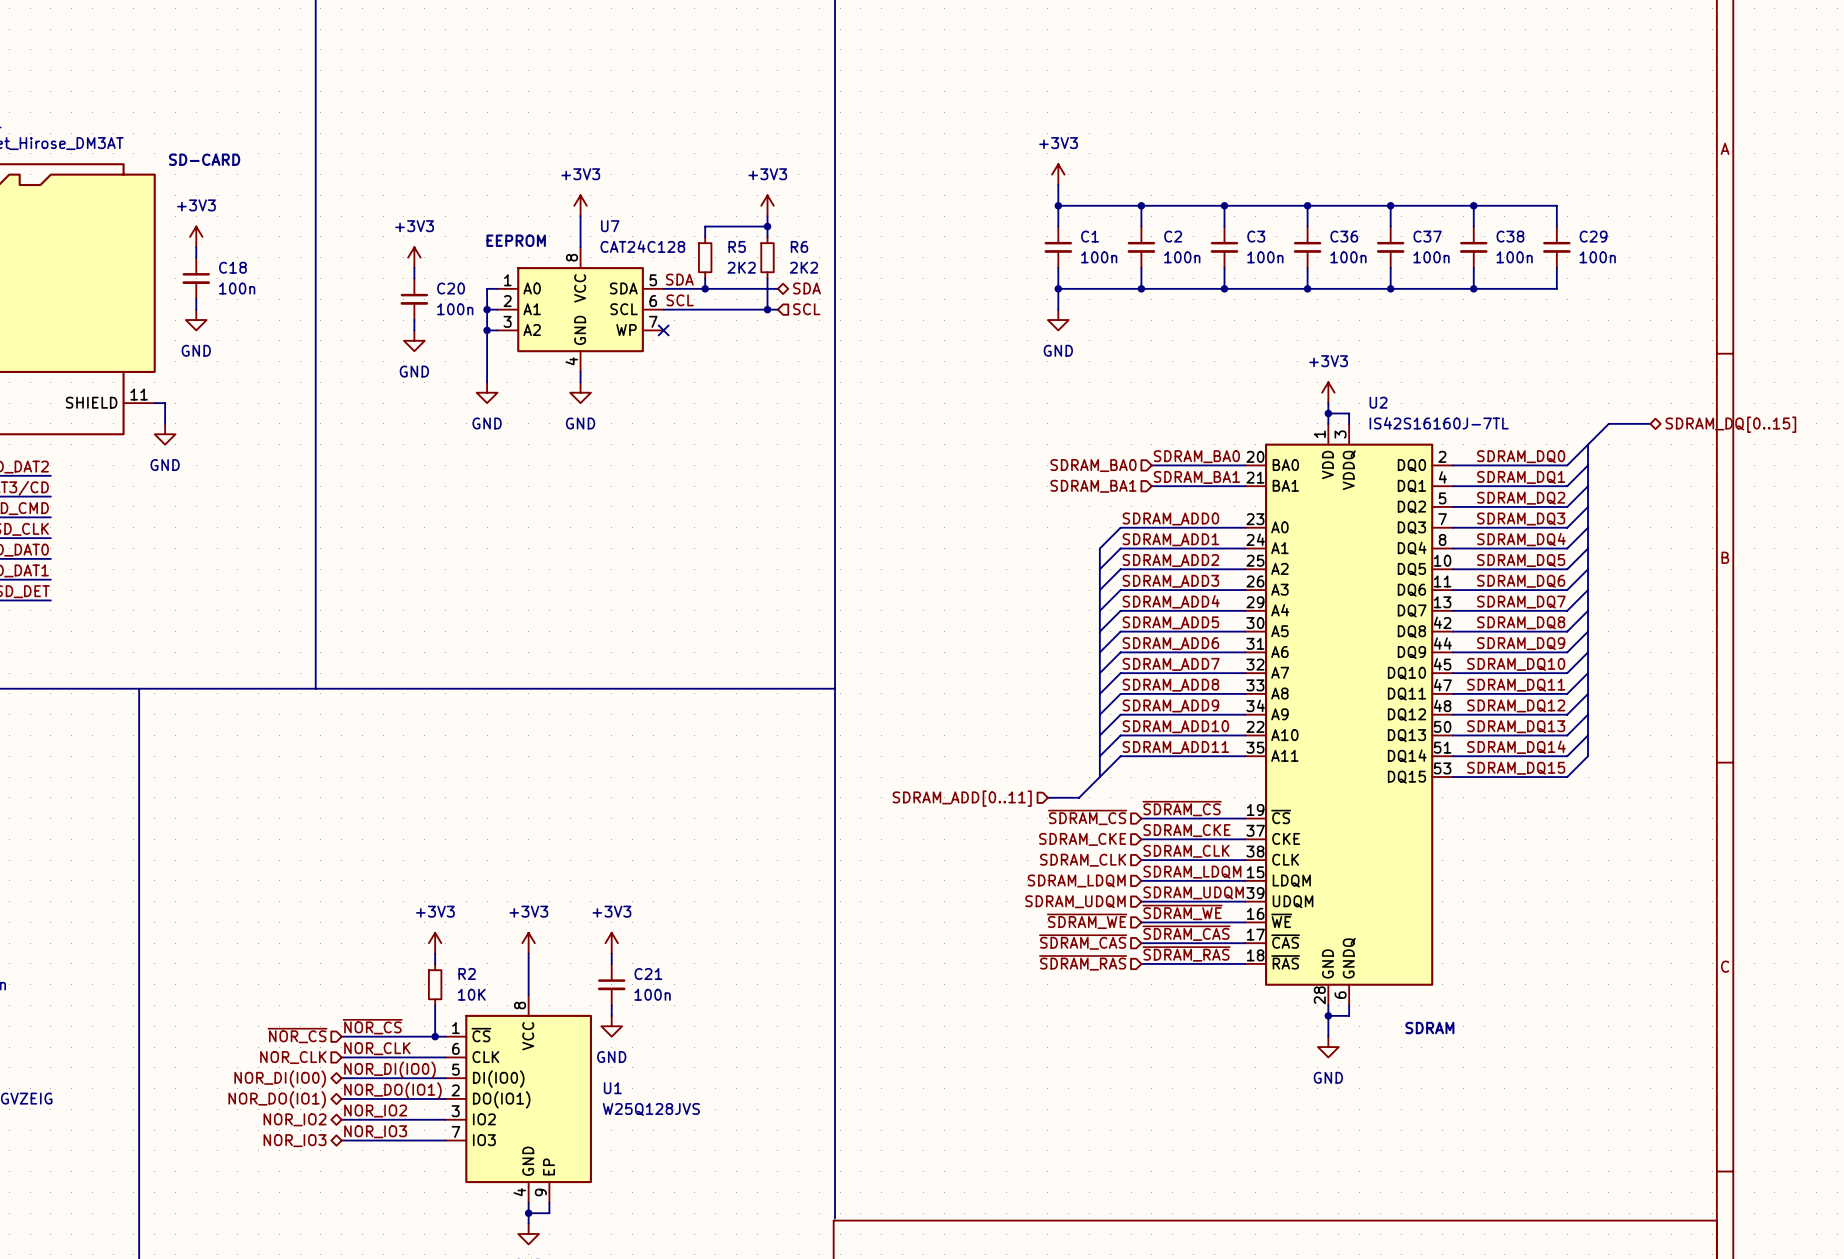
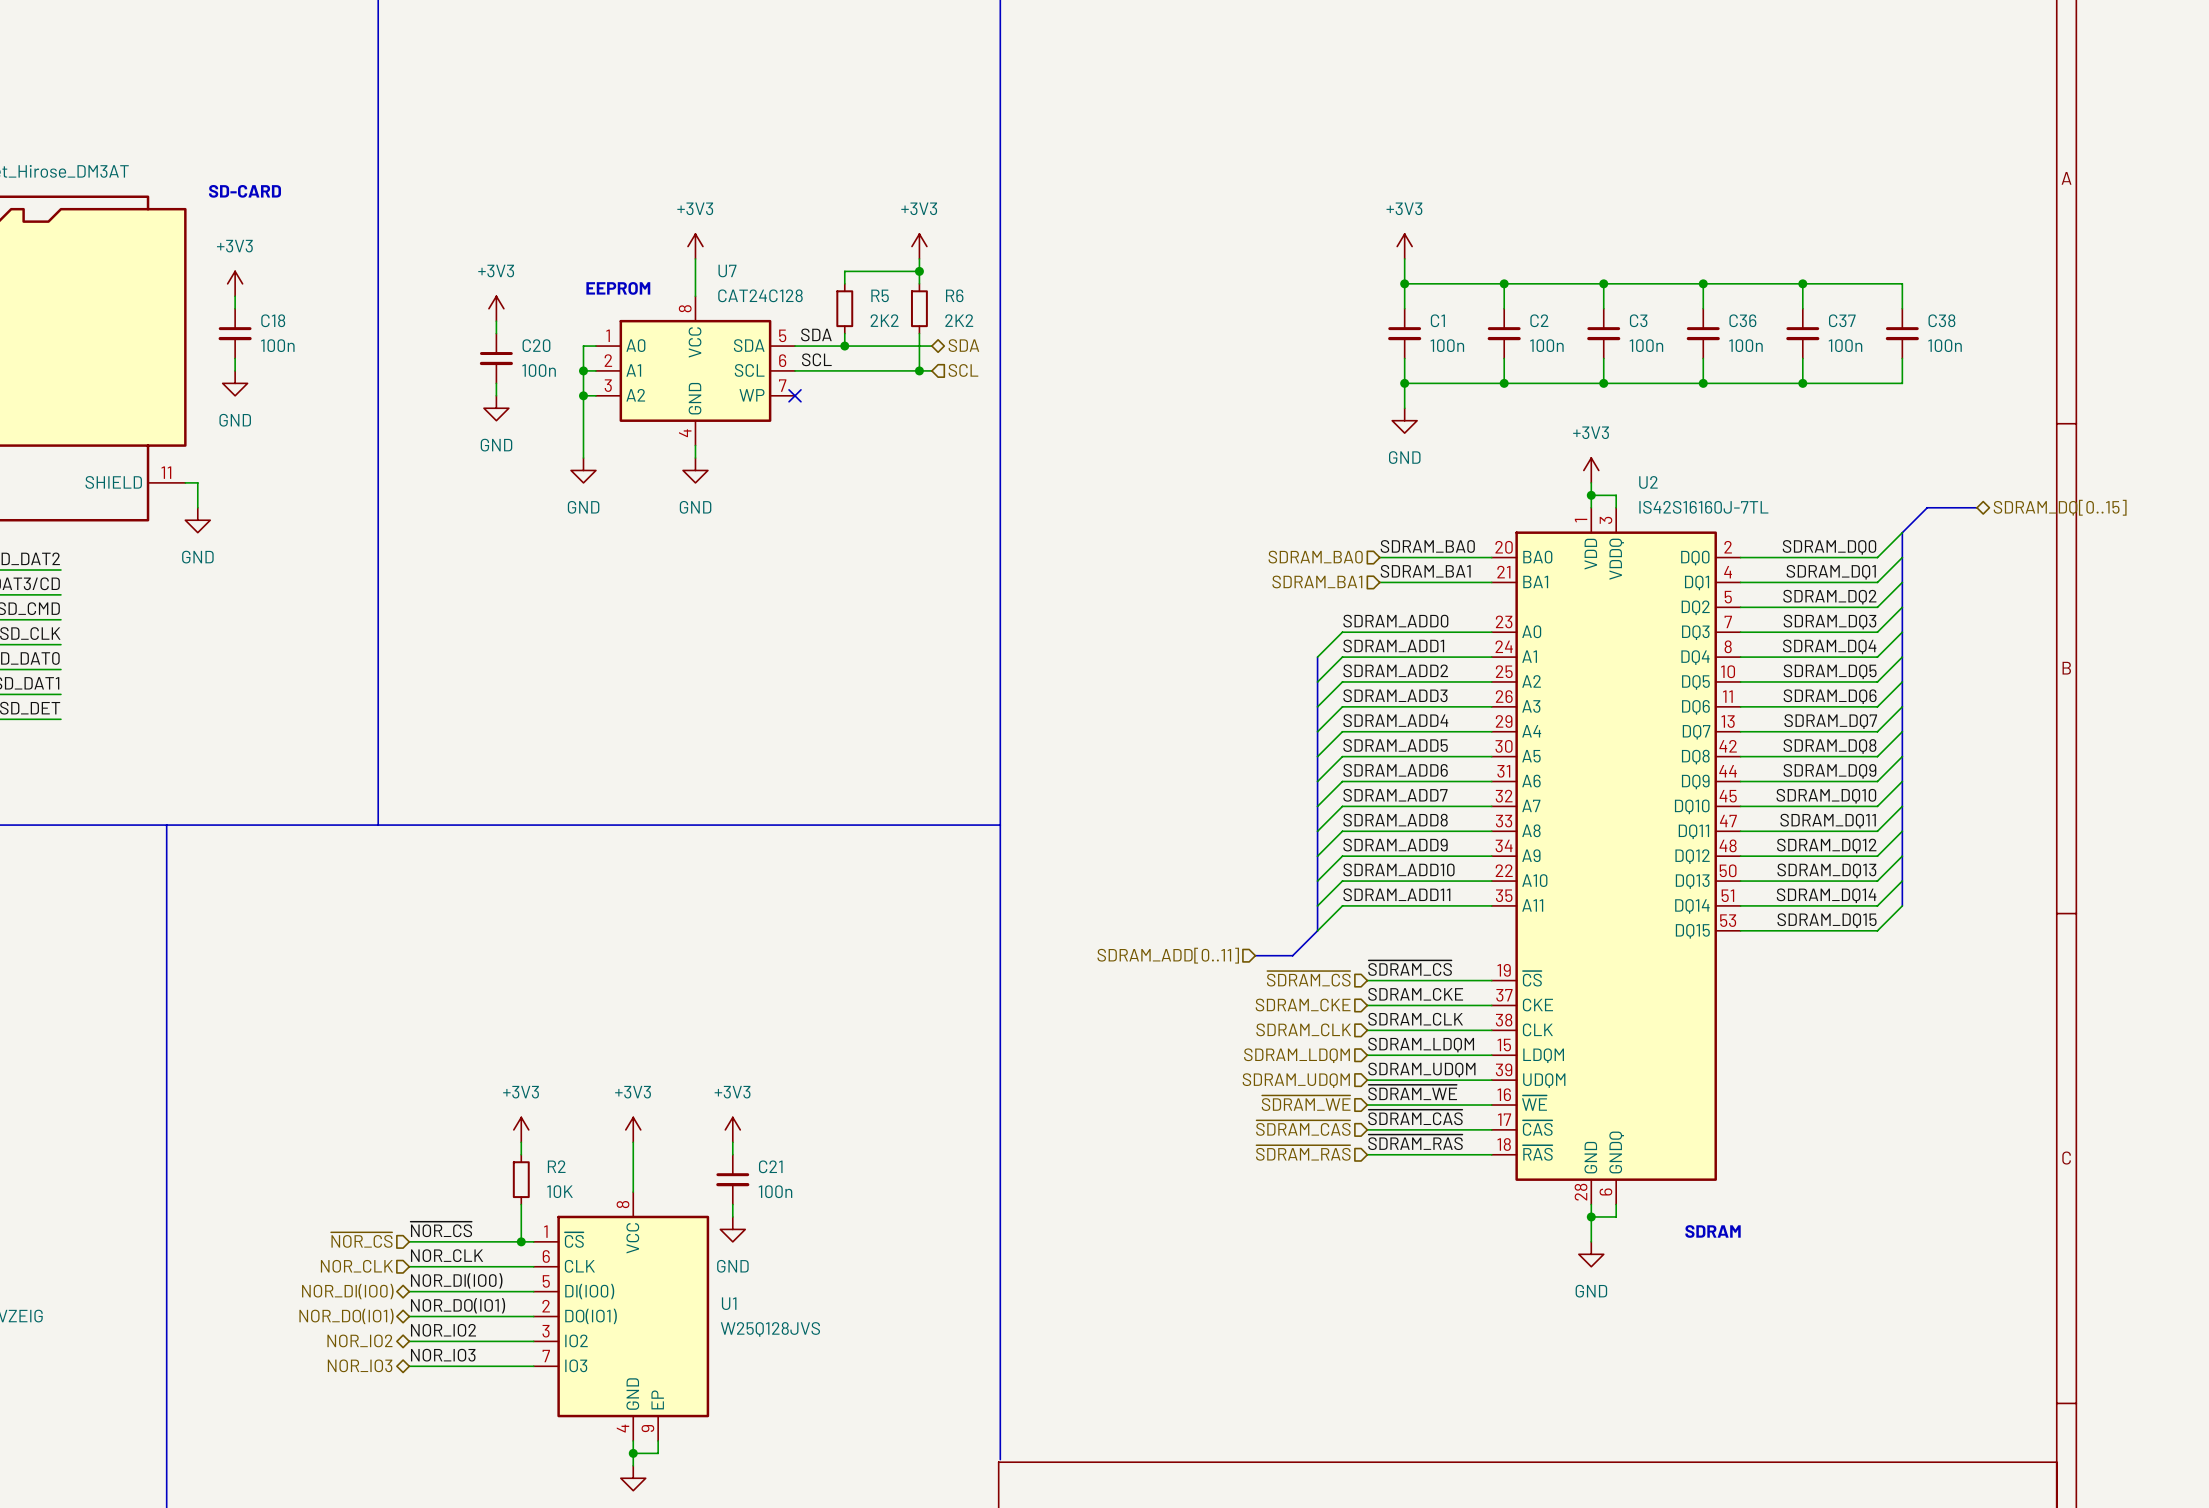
power symbol position: +3V3 (1058, 174) -> +3V3 (1404, 246)
wire: (1058, 185) (1058, 226) -> (1404, 258) (1404, 308)
wire: (1058, 205) (1556, 205) (1556, 226) -> none
junction: (1058, 205) -> none
wire: (1141, 205) (1141, 226) -> (1504, 283) (1504, 308)
junction: (1141, 205) -> none
wire: (1224, 205) (1224, 226) -> (1603, 283) (1603, 308)
junction: (1224, 205) -> none
wire: (1307, 205) (1307, 226) -> (1703, 283) (1703, 308)
junction: (1307, 205) -> none
wire: (1390, 205) (1390, 226) -> (1802, 283) (1802, 308)
junction: (1390, 205) -> none
wire: (1473, 205) (1473, 226) -> none
junction: (1473, 205) -> none
wire: none -> (1404, 283) (1902, 283) (1902, 308)
junction: none -> (1404, 283)
junction: none -> (1504, 283)
junction: none -> (1603, 283)
junction: none -> (1703, 283)
junction: none -> (1802, 283)
C1 position: (1058, 247) -> (1404, 333)
C2 position: (1141, 247) -> (1504, 333)
C3 position: (1224, 247) -> (1603, 333)
C36 position: (1307, 247) -> (1703, 333)
C37 position: (1390, 247) -> (1802, 333)
C38 position: (1473, 247) -> (1902, 333)
C29: 100n (1556, 247) -> none
wire: (1058, 268) (1058, 309) -> (1404, 358) (1404, 408)
wire: (1141, 268) (1141, 288) -> (1504, 358) (1504, 383)
wire: (1224, 268) (1224, 288) -> (1603, 358) (1603, 383)
wire: (1307, 268) (1307, 288) -> (1703, 358) (1703, 383)
wire: (1390, 268) (1390, 288) -> (1802, 358) (1802, 383)
wire: (1473, 268) (1473, 288) -> none
wire: (1556, 268) (1556, 288) (1058, 288) -> none
junction: (1058, 288) -> none
junction: (1141, 288) -> none
junction: (1224, 288) -> none
junction: (1307, 288) -> none
junction: (1390, 288) -> none
junction: (1473, 288) -> none
wire: none -> (1902, 358) (1902, 383) (1404, 383)
power symbol position: GND (1058, 320) -> GND (1404, 420)
junction: none -> (1404, 383)
junction: none -> (1504, 383)
junction: none -> (1603, 383)
junction: none -> (1703, 383)
junction: none -> (1802, 383)

